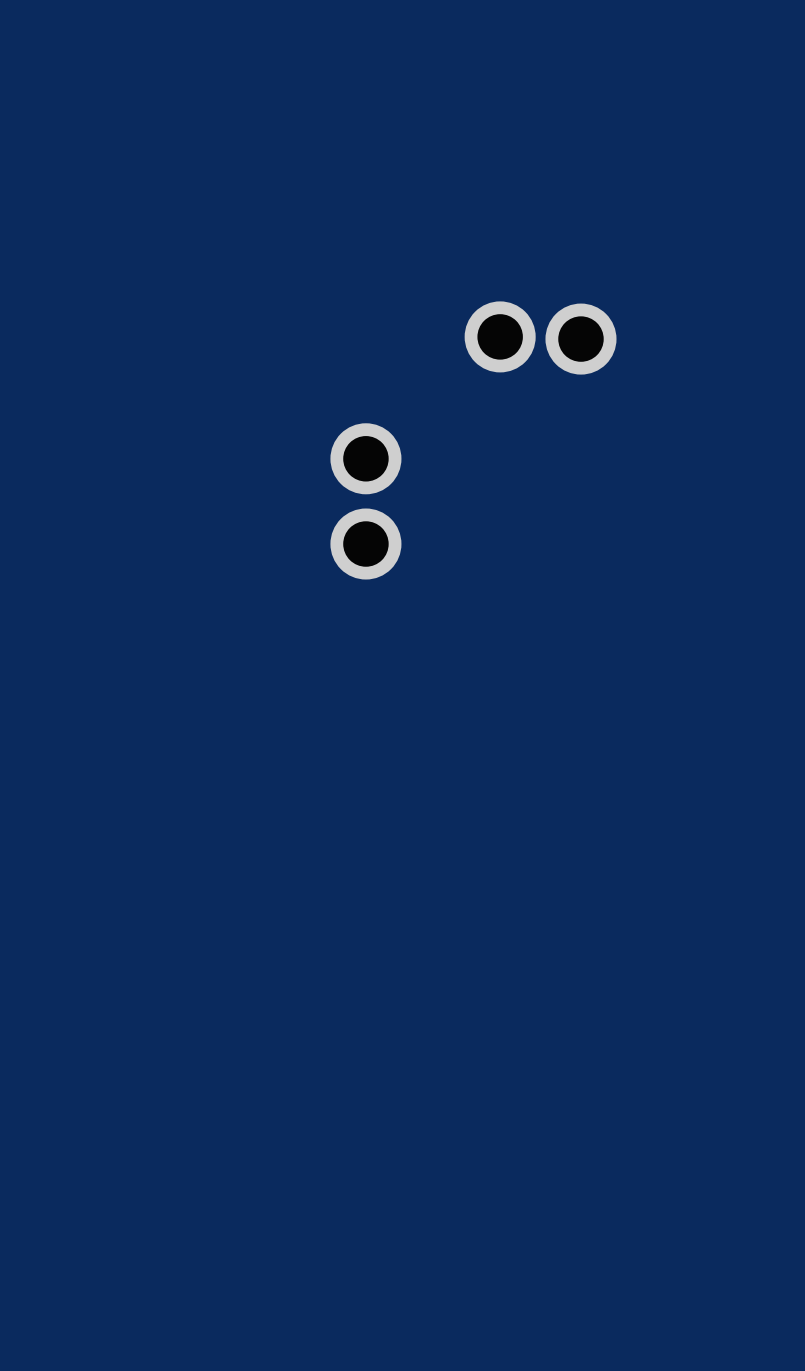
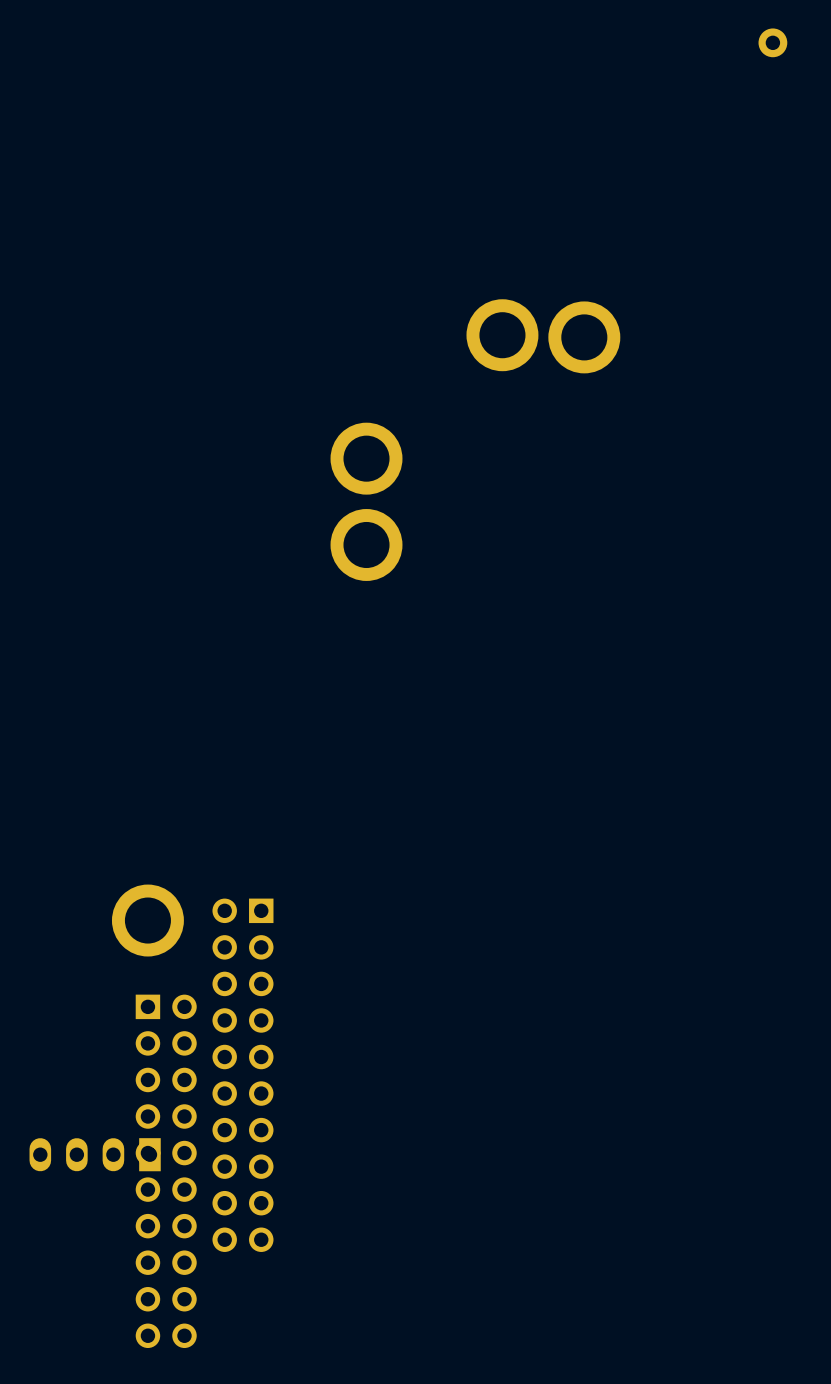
part: none -> (772, 42)
part: none -> (147, 920)
part: none -> (242, 1075)
part: none -> (95, 1154)
part: none -> (166, 1171)

